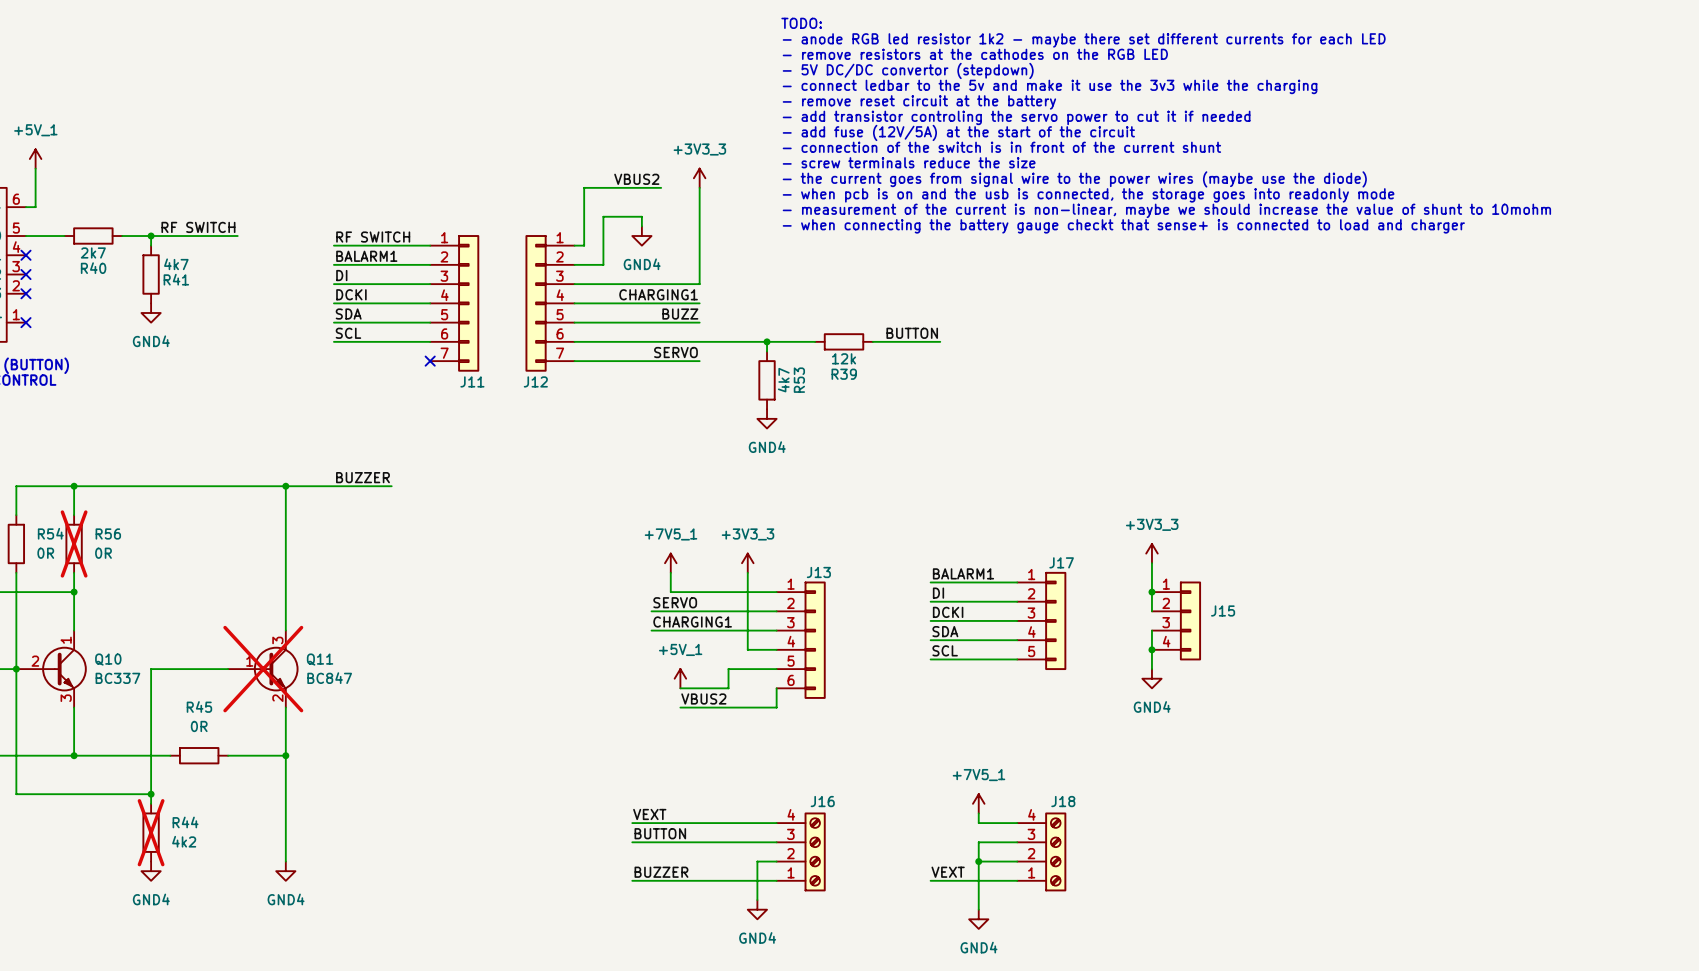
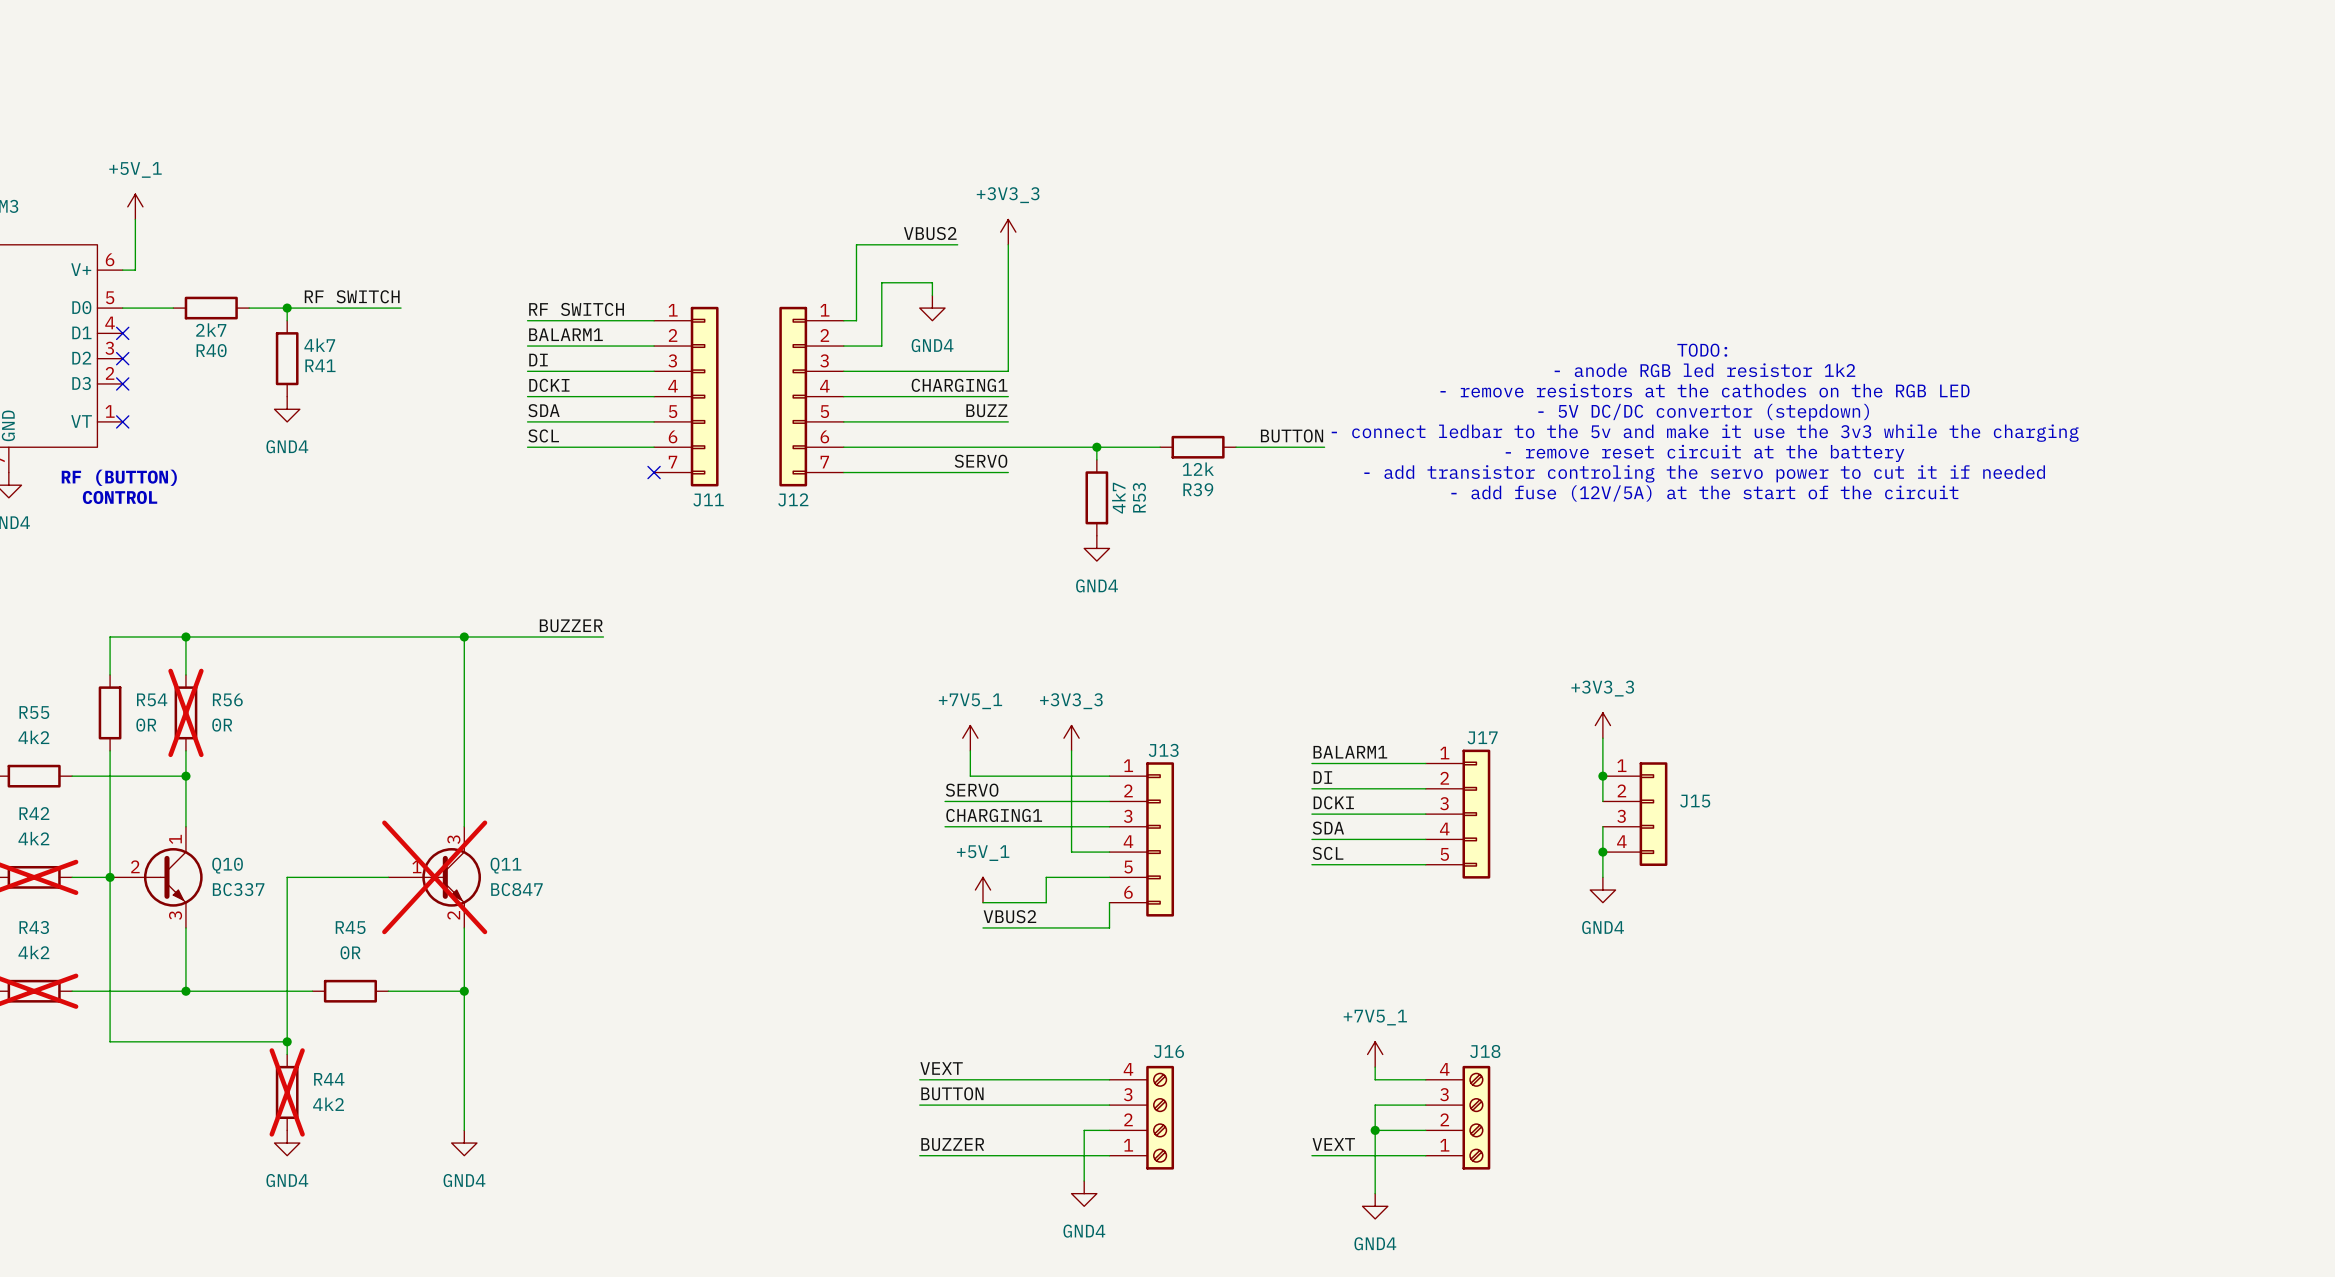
text: TODO: (801, 23) -> none
text: - anode RGB led resistor 1k2 - maybe there set different currents for each LED (1084, 40) -> none
text: - remove resistors at the cathodes on the RGB LED (975, 54) -> none
text: - 5V DC/DC convertor (stepdown) (908, 70) -> none
text: - connect ledbar to the 5v and make it use the 3v3 while the charging (1050, 86) -> none
text: - remove reset circuit at the battery (919, 102) -> none
text: - add transistor controling the servo power to cut it if needed (1016, 117) -> none
text: - add fuse (12V/5A) at the start of the circuit (958, 132) -> none
text: - connection of the switch is in front of the current shunt (1001, 147) -> none
text: - screw terminals reduce the size (909, 162) -> none
text: - the current goes from signal wire to the power wires (maybe use the diode) (1074, 179) -> none
text: - when pcb is on and the usb is connected, the storage goes into readonly mode (1088, 195) -> none
text: - measurement of the current is non-linear, maybe we should increase the value of shunt to 10mohm (1166, 210) -> none
text: - when connecting the battery gauge checkt that sense+ is connected to load and charger (1123, 226) -> none
text: none -> TODO: (1702, 350)
text: none -> - anode RGB led resistor 1k2 (1704, 370)
text: none -> - remove resistors at the cathodes on the RGB LED (1705, 390)
text: none -> - 5V DC/DC convertor (stepdown) (1703, 412)
text: none -> - connect ledbar to the 5v and make it use the 3v3 while the charging (1705, 433)
text: none -> - remove reset circuit at the battery (1705, 453)
text: none -> - add transistor controling the servo power to cut it if needed (1704, 473)
text: none -> - add fuse (12V/5A) at the start of the circuit (1704, 493)

